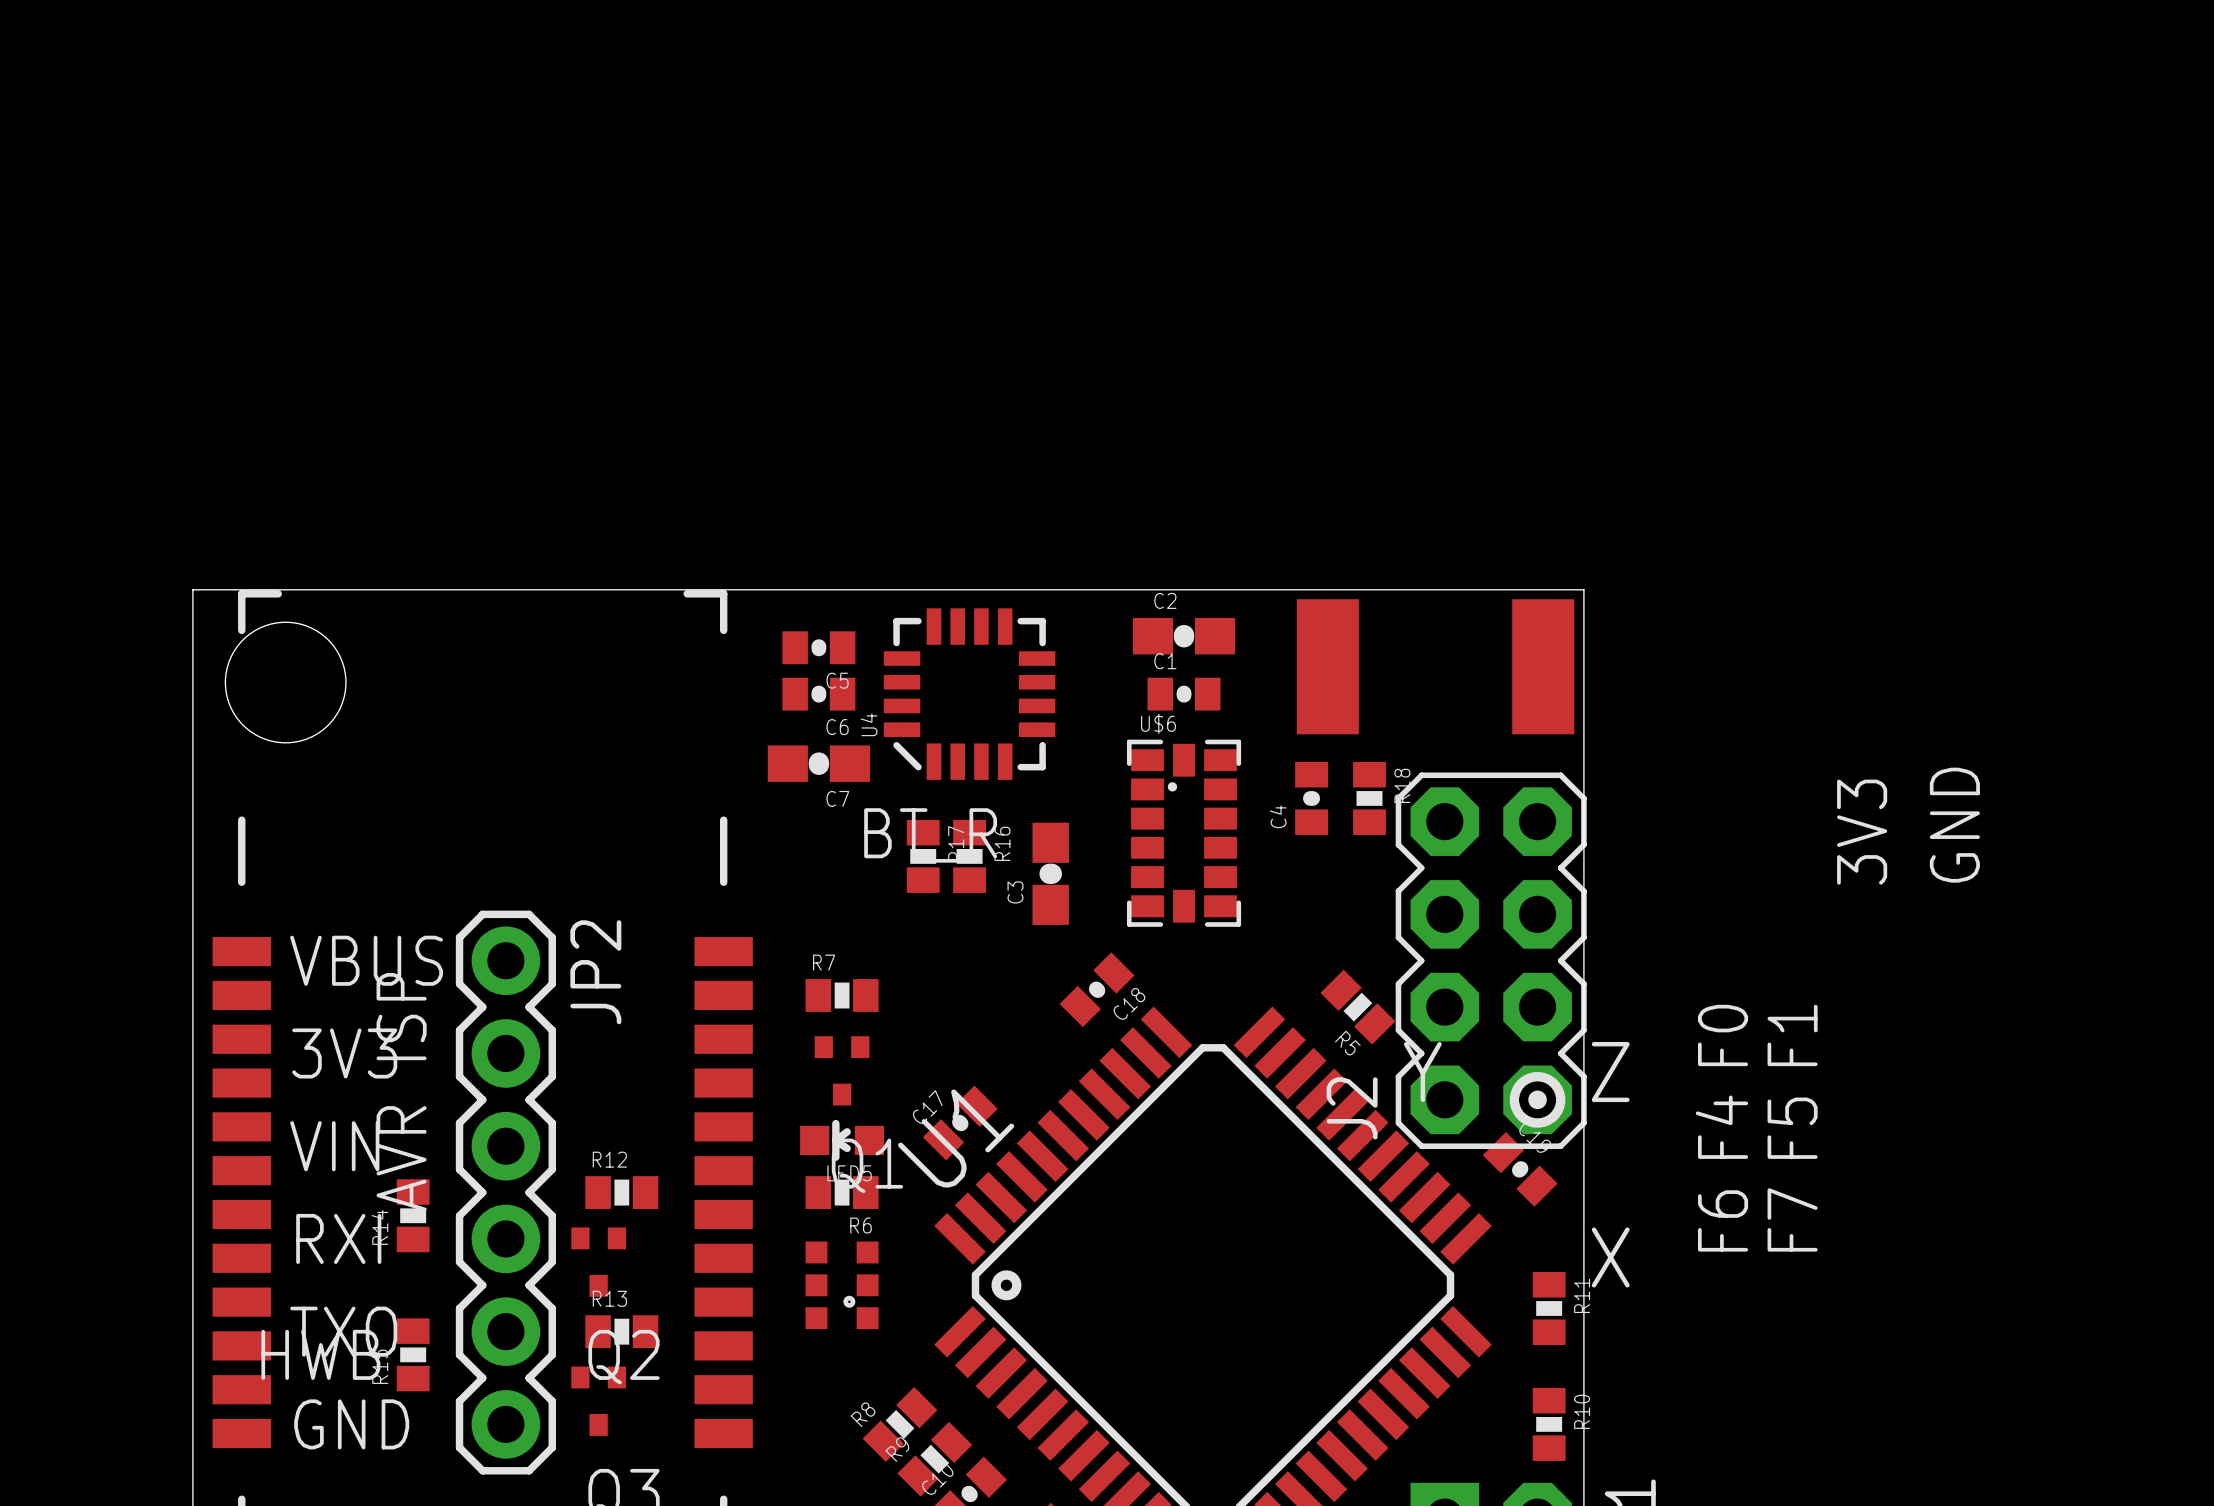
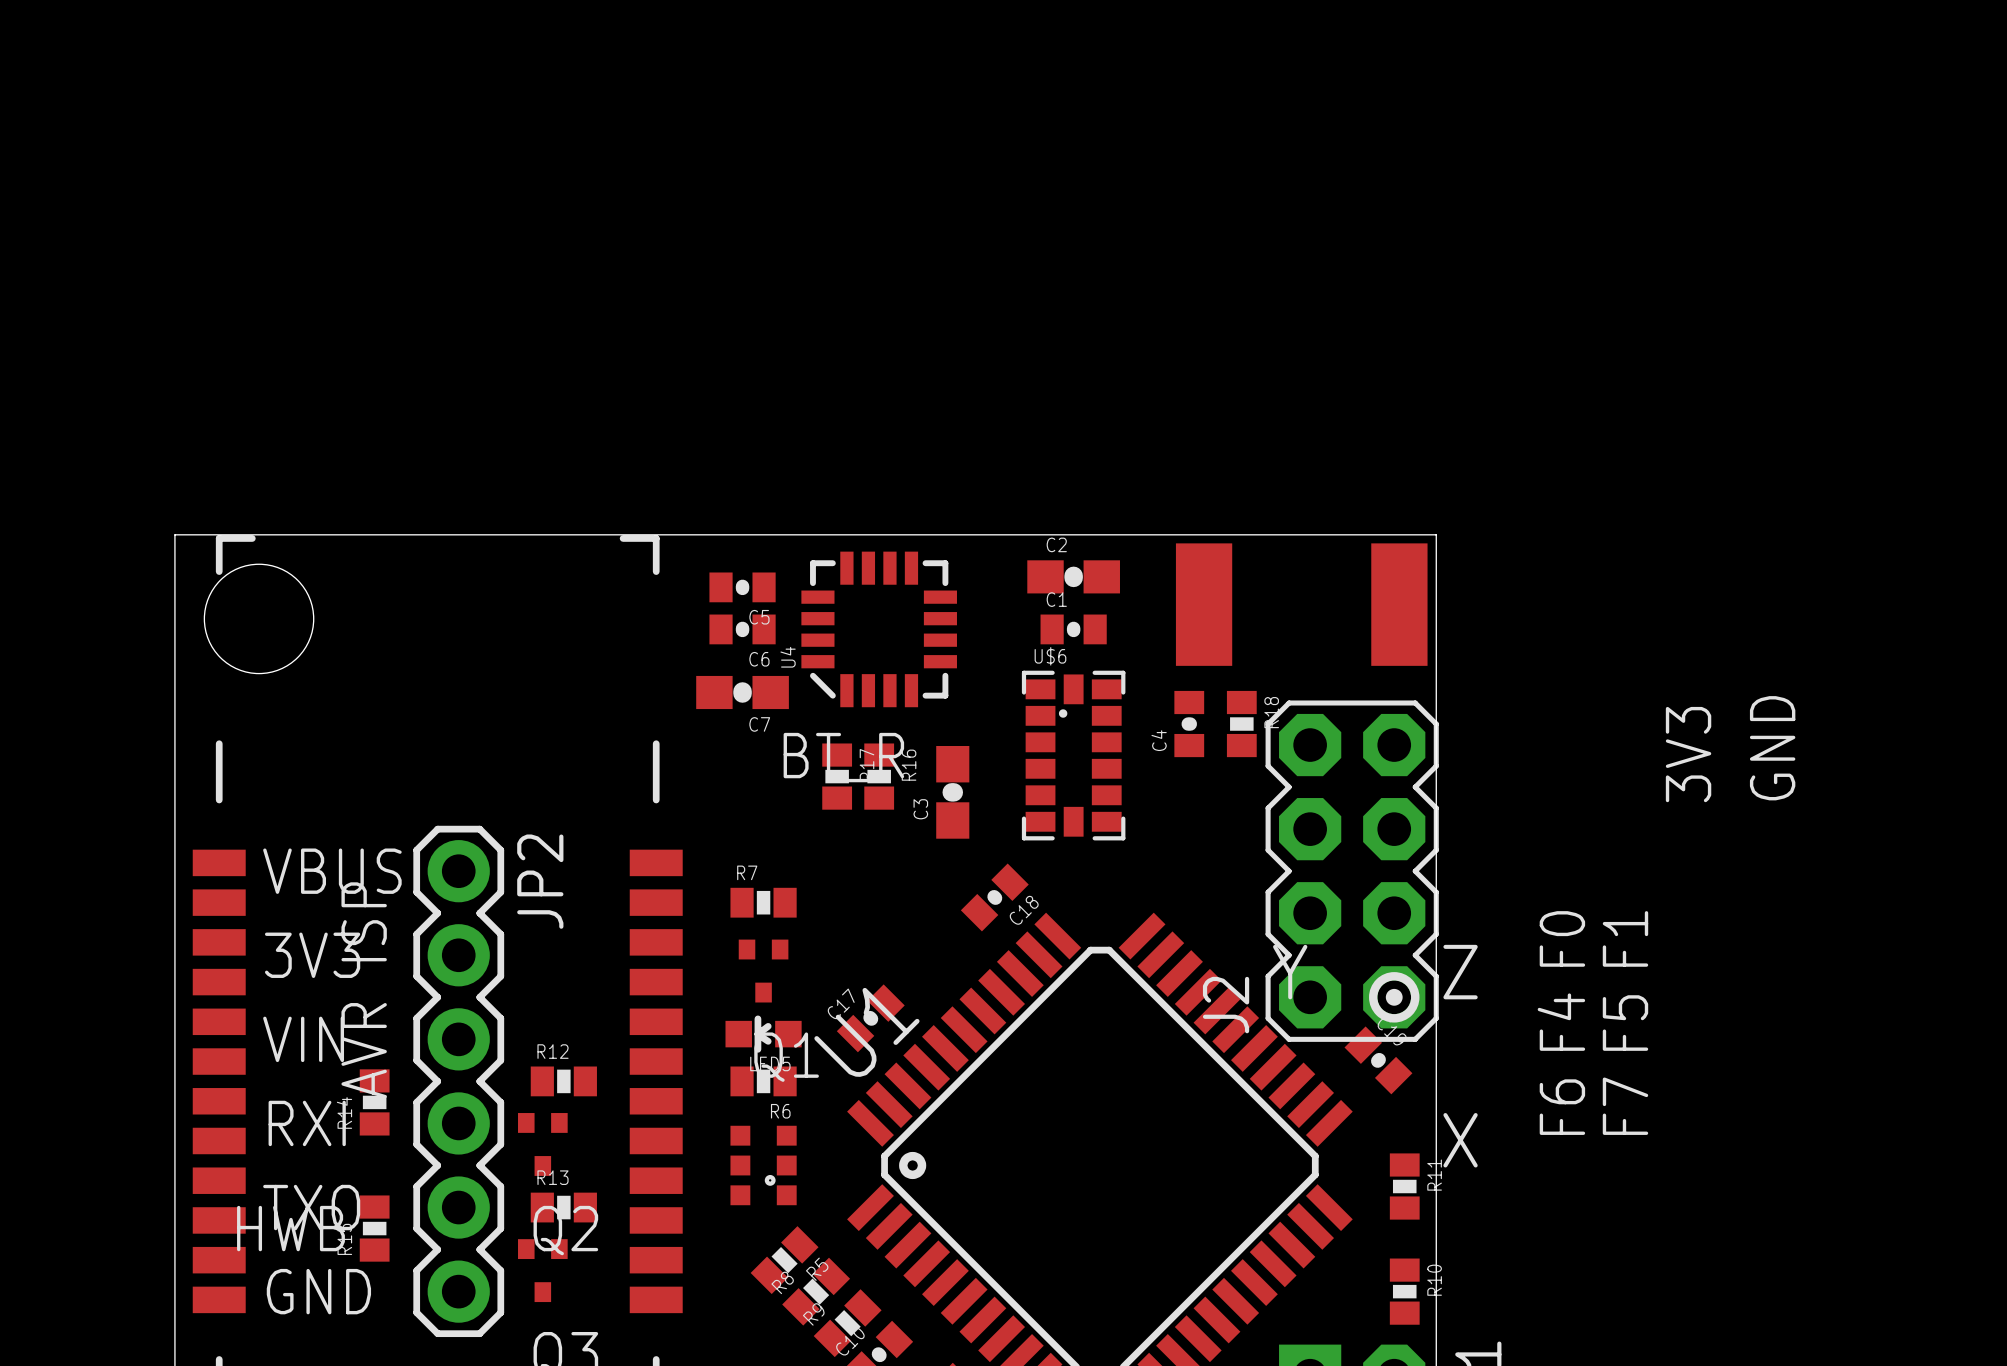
R5 rotation: 0° (1357, 1007) -> 90° clockwise (784, 1260)
R5 position: (1357, 1007) -> (784, 1260)

